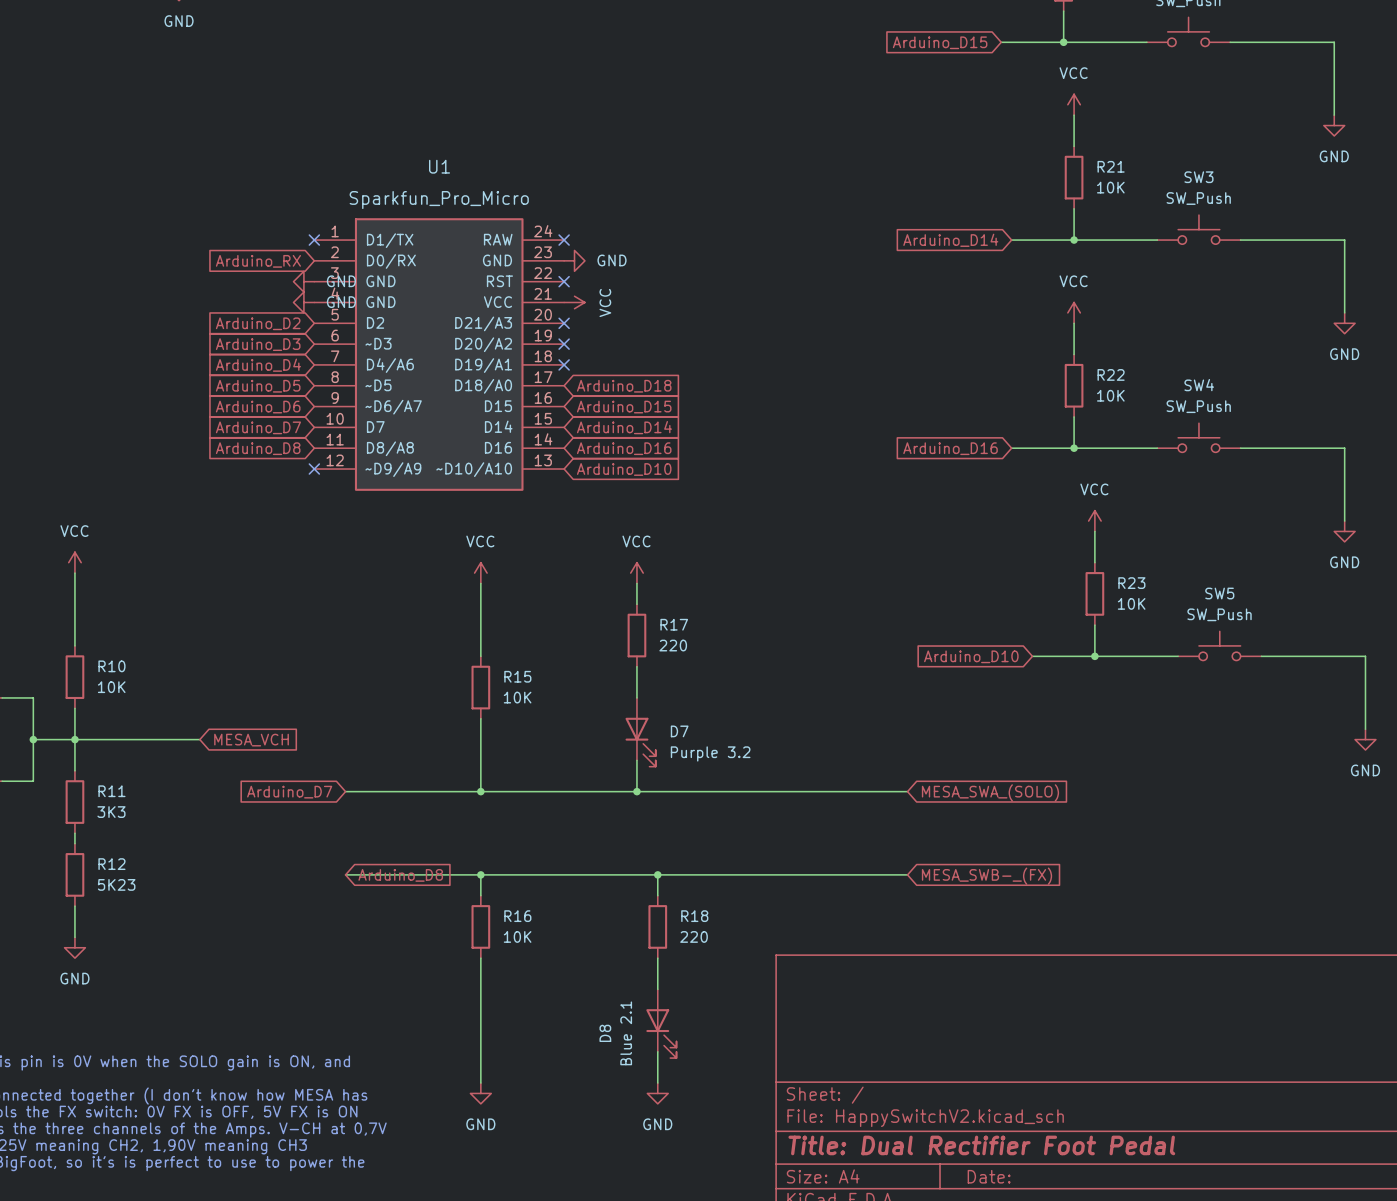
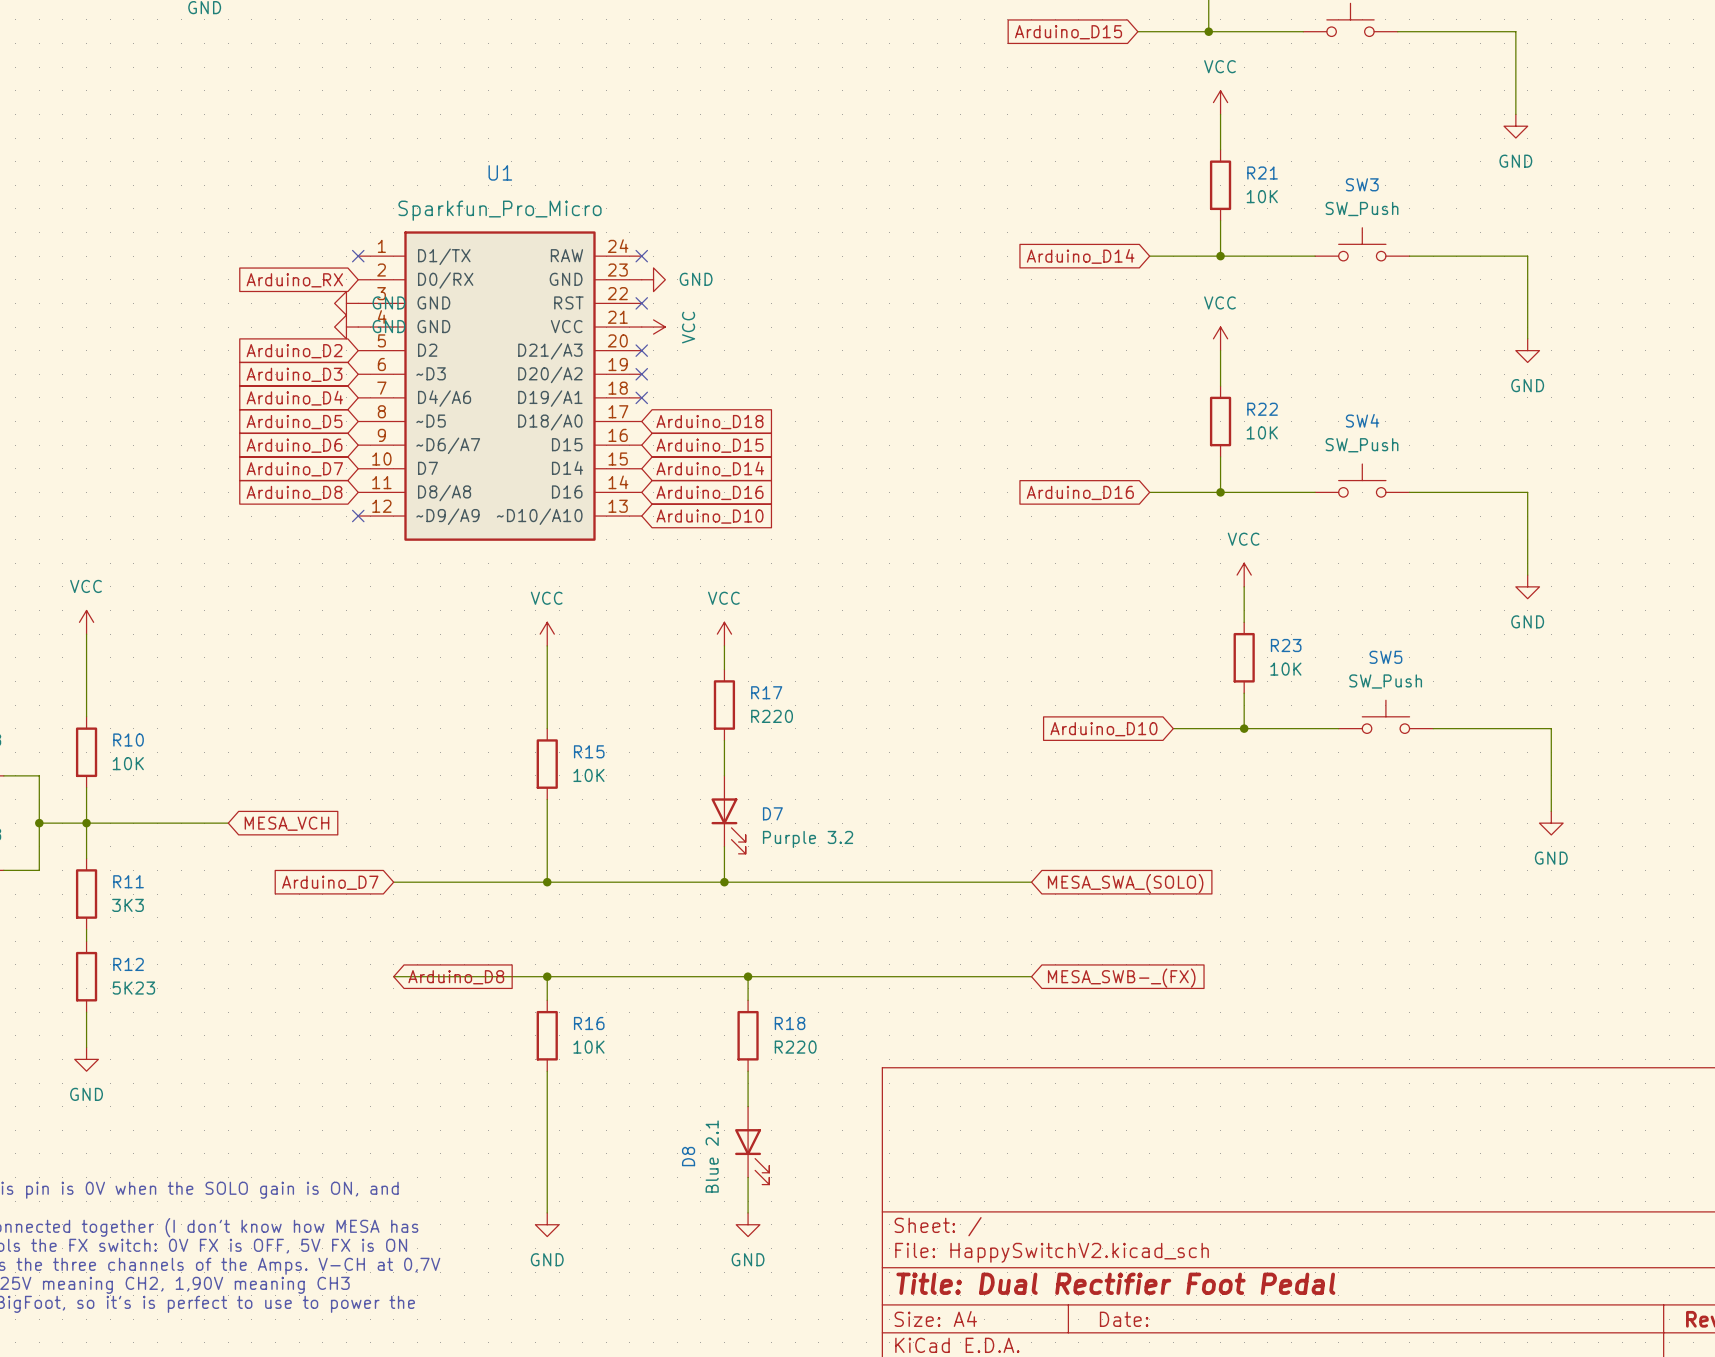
R17 value: 220 (673, 645) -> R220 (772, 716)
R18 value: 220 (694, 936) -> R220 (795, 1047)

